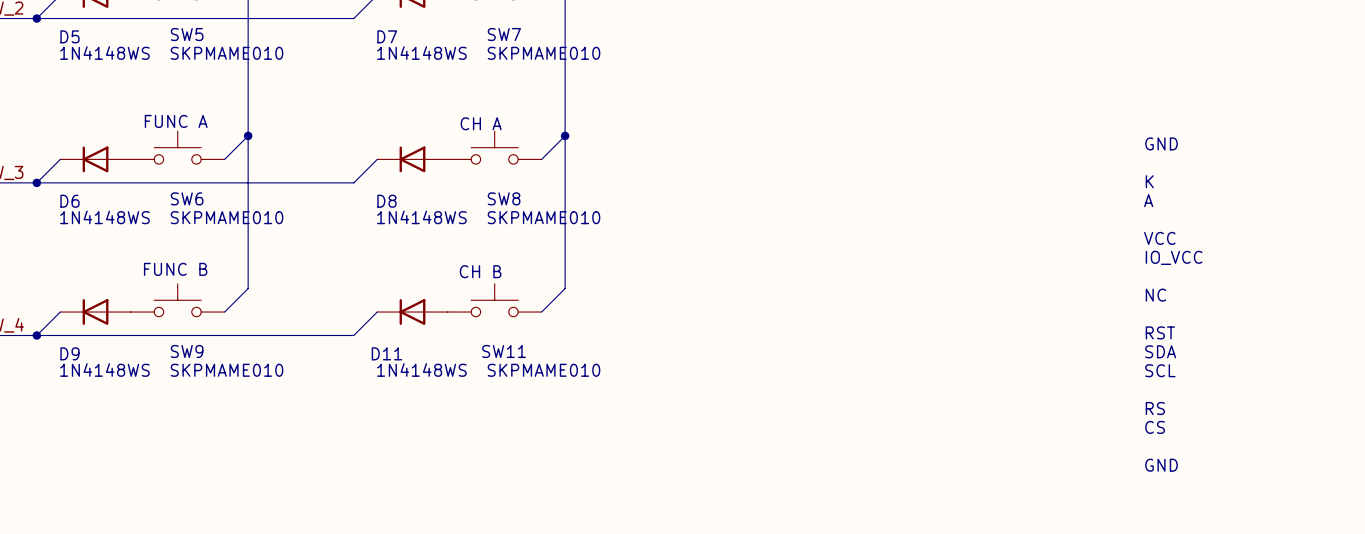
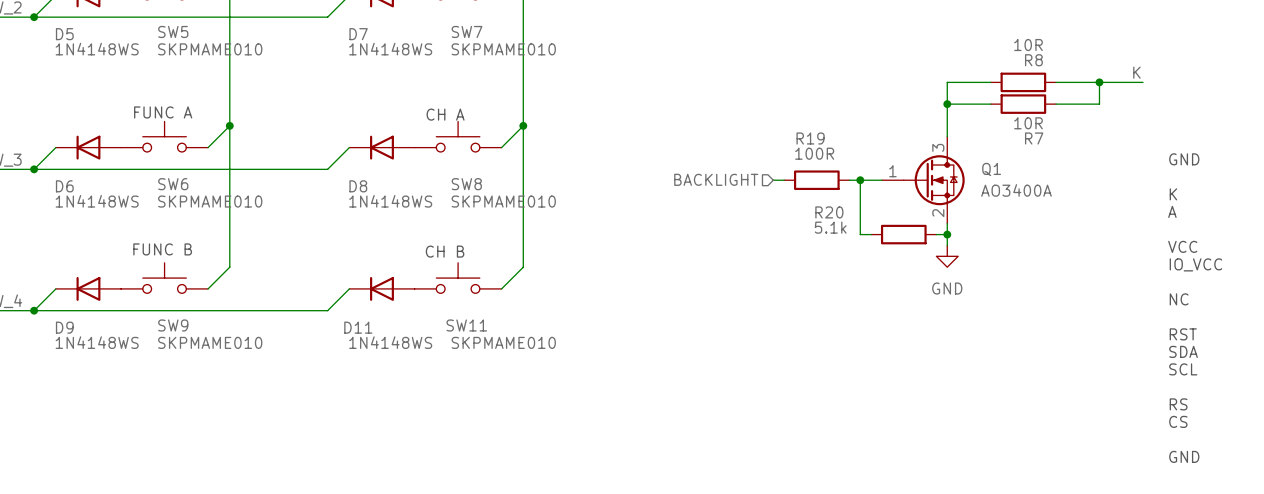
label: none -> K (1136, 72)
wire: none -> (990, 82) (947, 82) (947, 136)
R8: none -> 10R (1023, 82)
wire: none -> (1055, 82) (1142, 82)
wire: none -> (1099, 82) (1099, 104) (1055, 104)
junction: none -> (1099, 82)
wire: none -> (947, 104) (990, 104)
junction: none -> (947, 104)
R7: none -> 10R (1023, 104)
text position: GND (1161, 143) -> GND (1184, 159)
text position: K (1149, 181) -> K (1173, 194)
hierarchical label: none -> BACKLIGHT (716, 179)
wire: none -> (773, 180) (784, 180)
R19: none -> 100R (816, 180)
wire: none -> (849, 180) (882, 180)
wire: none -> (860, 180) (860, 234) (871, 234)
junction: none -> (860, 180)
Q1: none -> AO3400A (923, 180)
text position: A (1148, 200) -> A (1172, 211)
text position: VCC (1159, 238) -> VCC (1182, 246)
wire: none -> (947, 223) (947, 245)
R20: none -> 5.1k (903, 234)
wire: none -> (936, 234) (947, 234)
junction: none -> (947, 234)
text position: IO_VCC (1174, 257) -> IO_VCC (1195, 264)
power symbol: none -> GND (947, 256)
text position: NC (1155, 295) -> NC (1179, 299)
text position: RST (1160, 332) -> RST (1183, 334)
text position: SDA (1160, 351) -> SDA (1183, 351)
text position: SCL (1160, 370) -> SCL (1183, 369)
text position: RS (1155, 408) -> RS (1178, 404)
text position: CS (1155, 427) -> CS (1178, 421)
text position: GND (1161, 465) -> GND (1184, 456)

